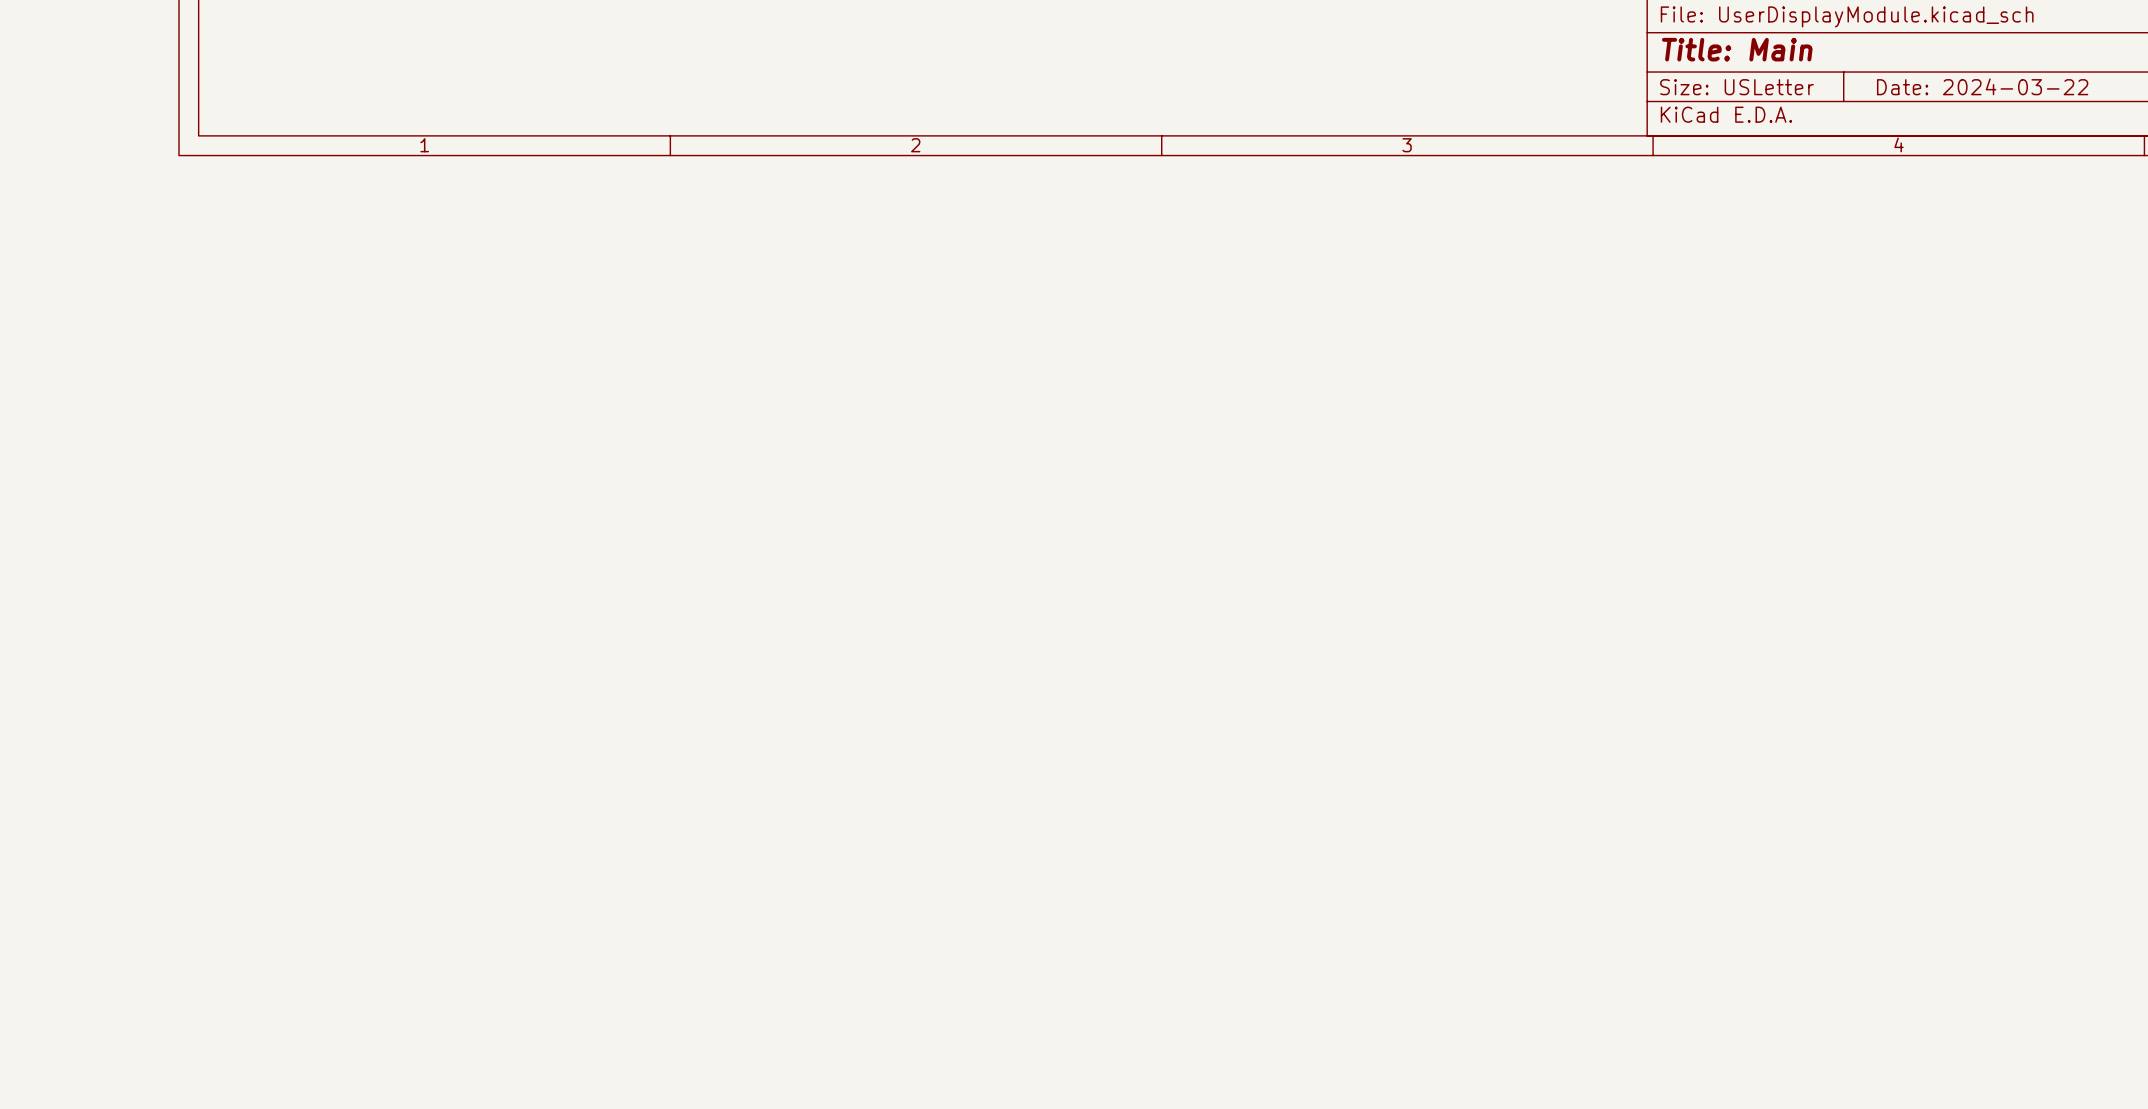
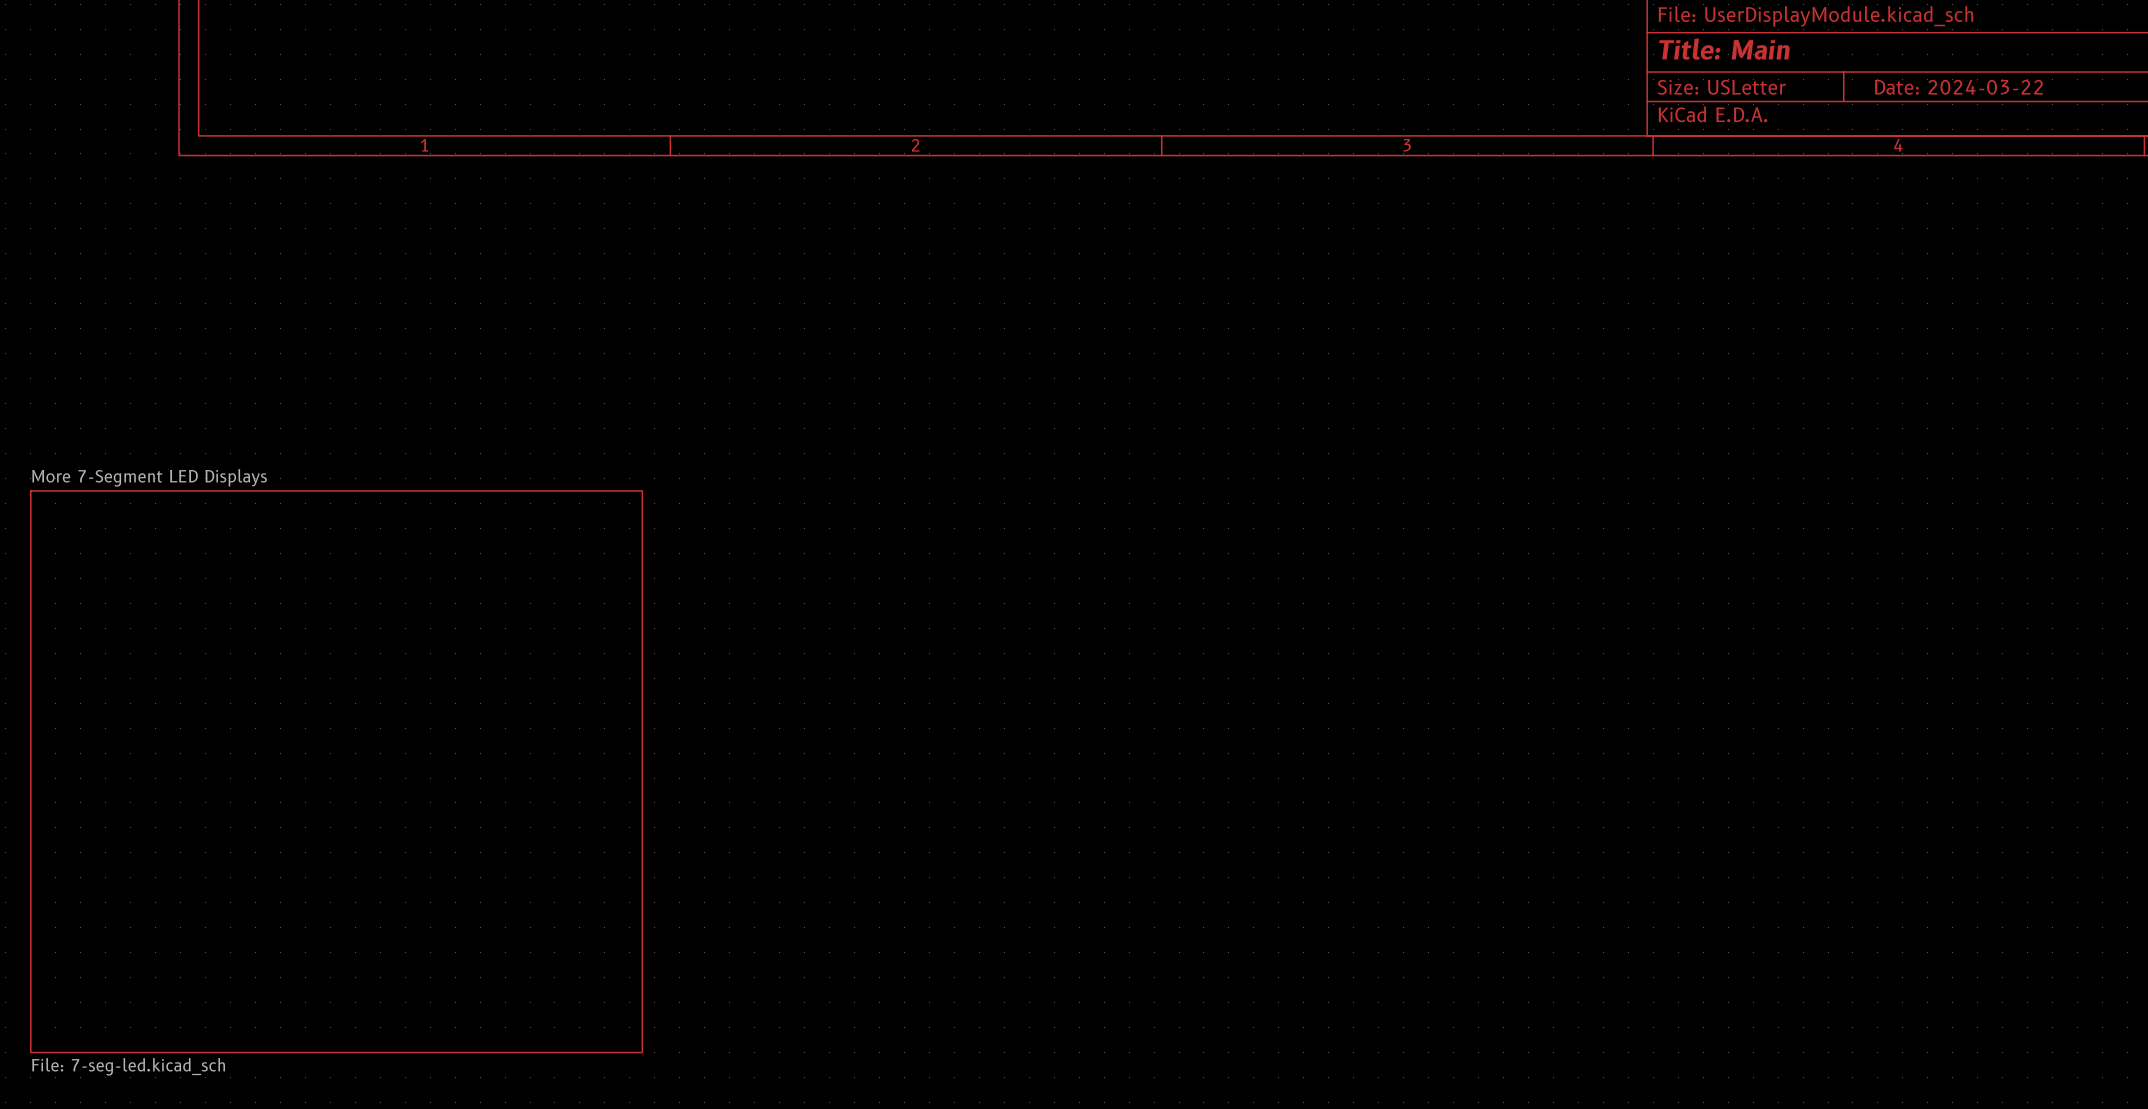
sheet More 7-Segment LED Displays: none -> File: 7-seg-led.kicad_sch (336, 771)

